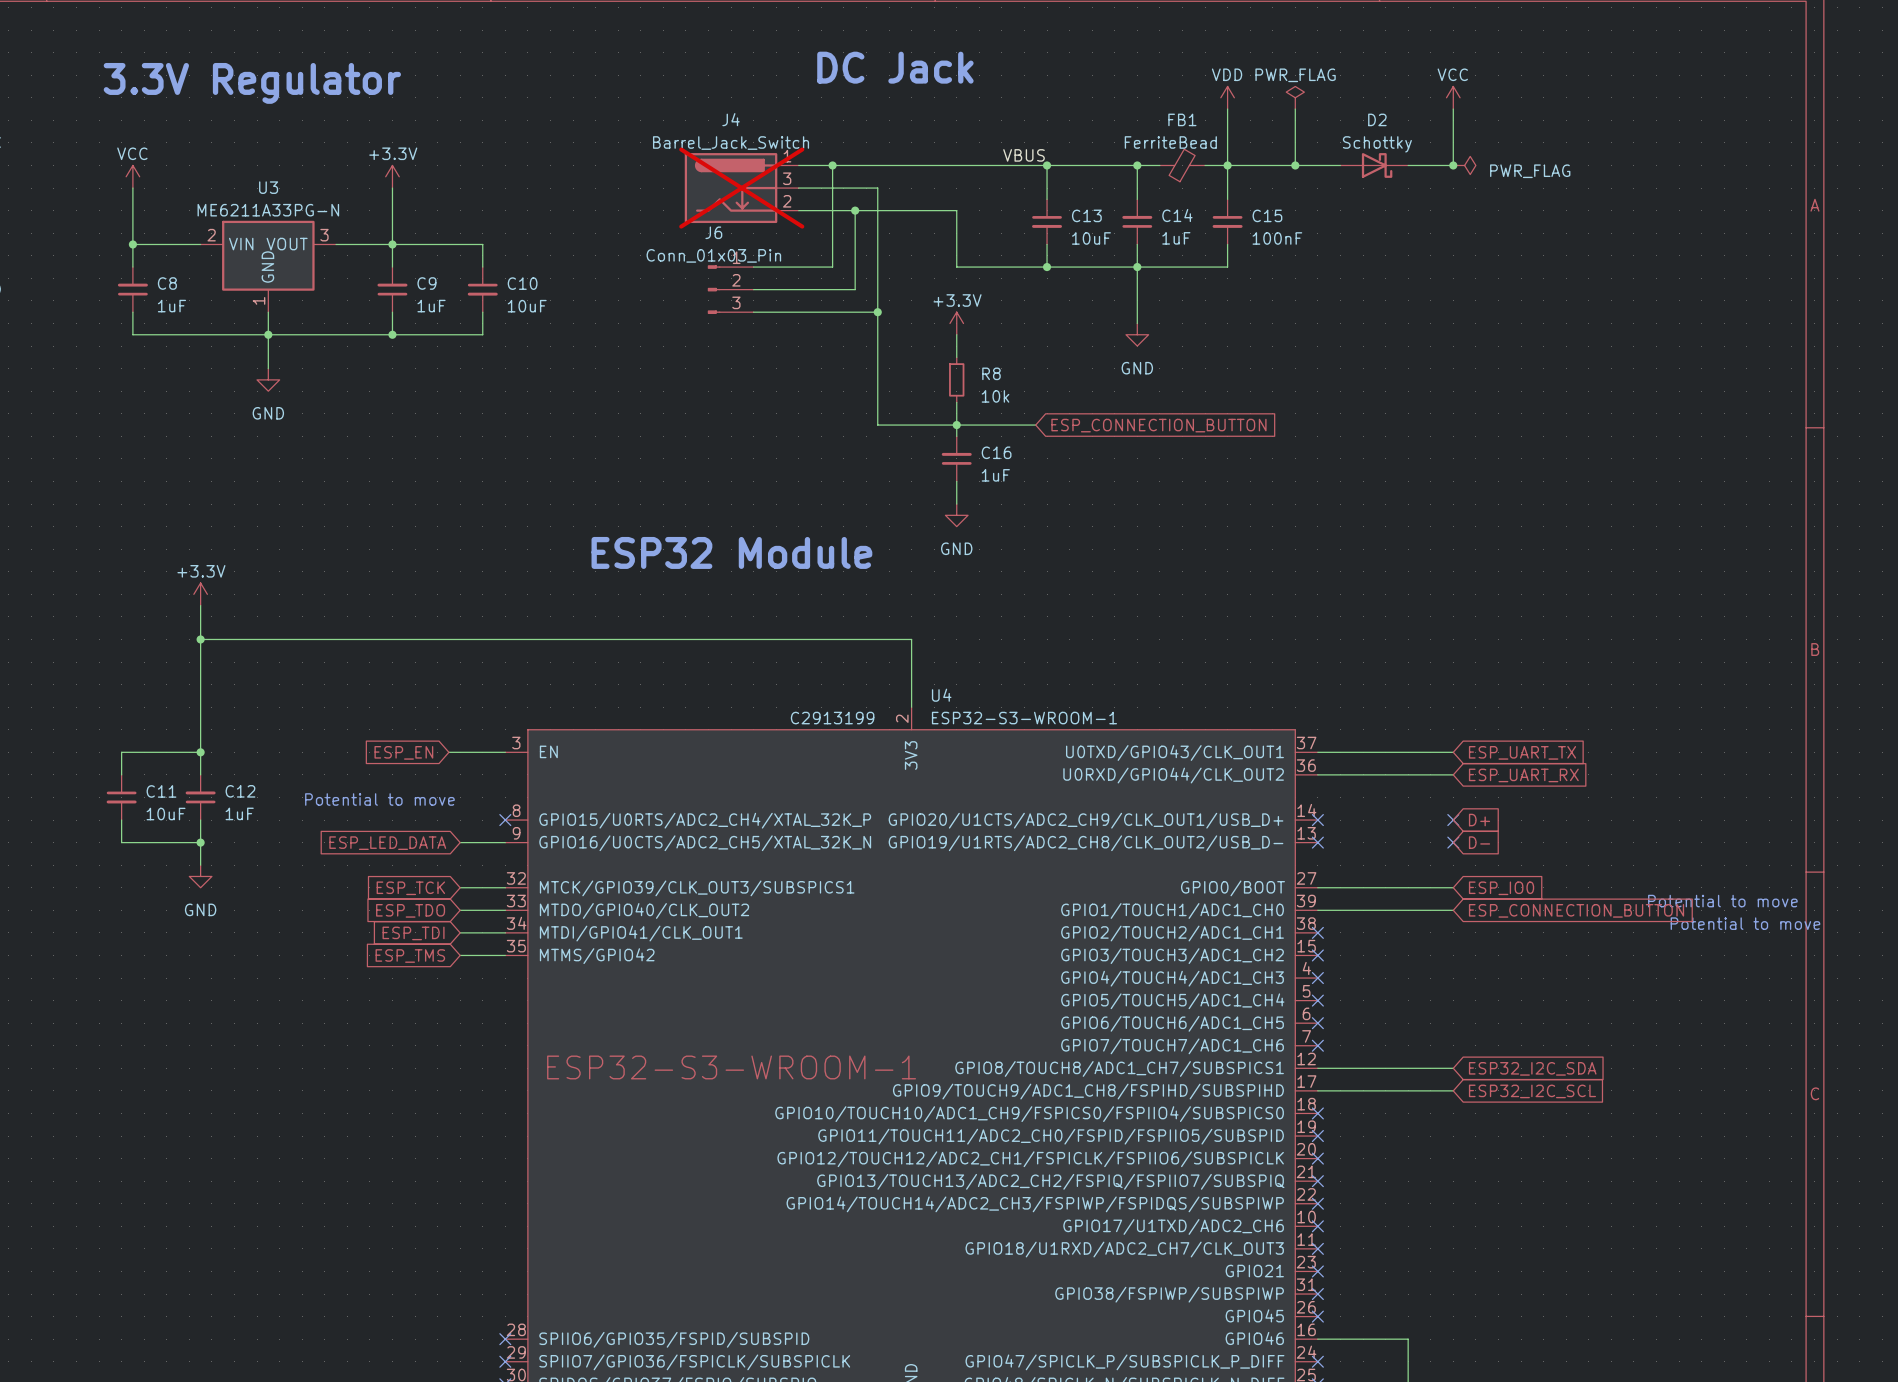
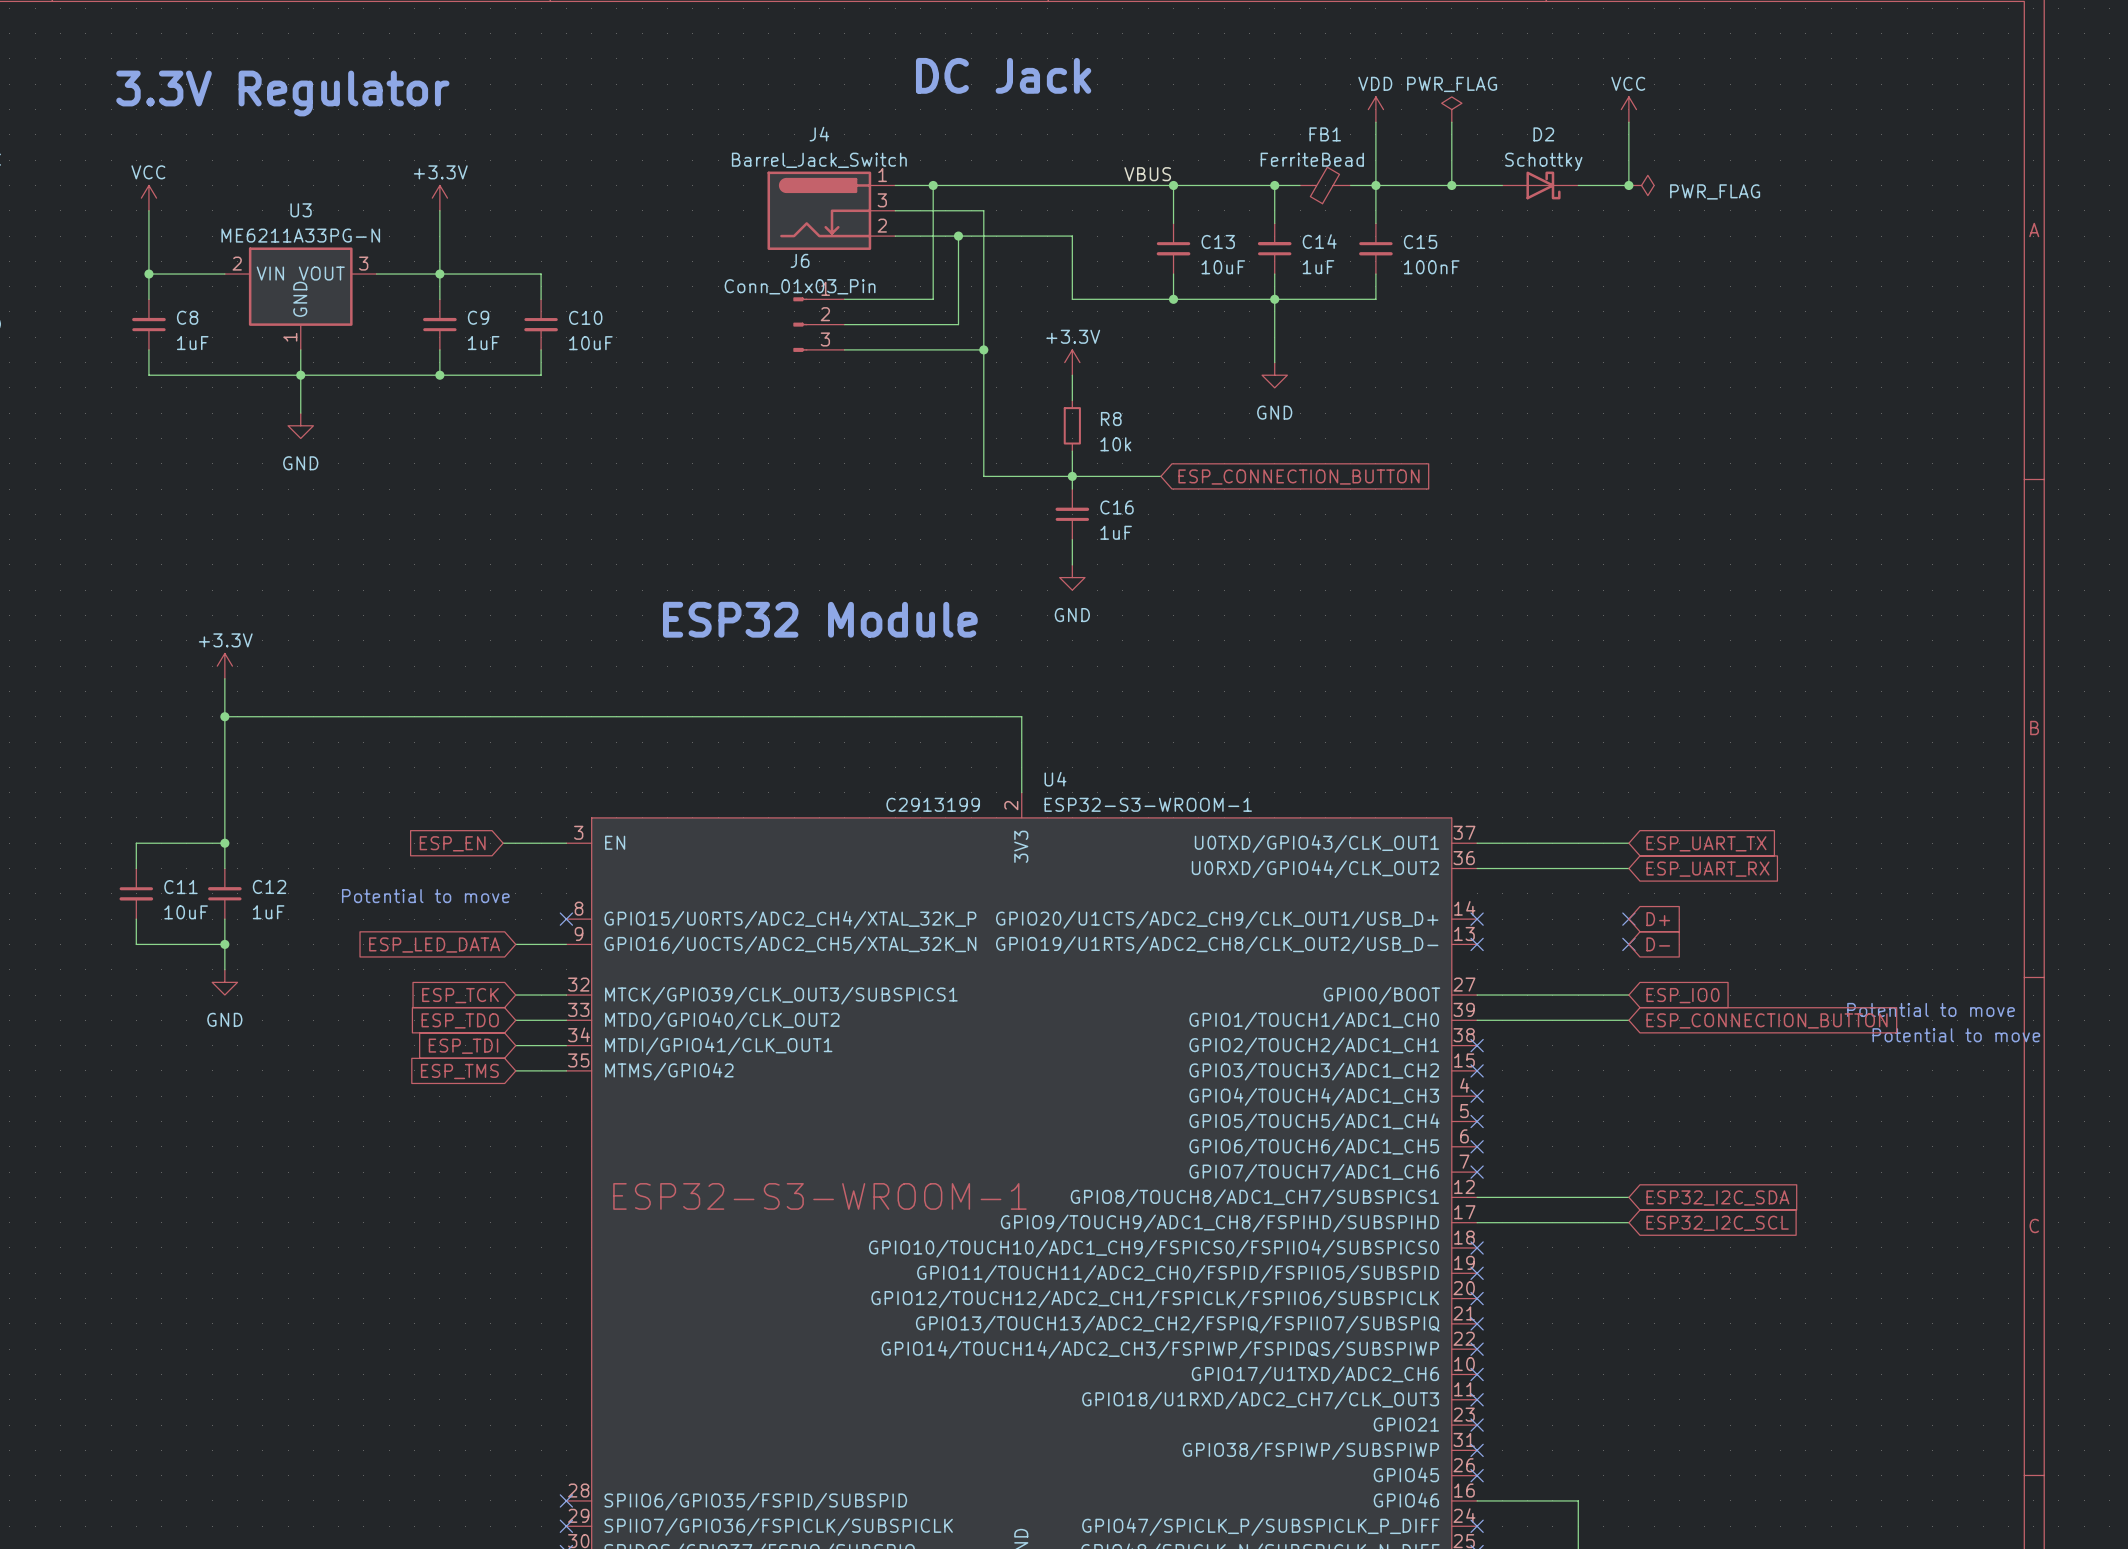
J4 do-not-place cross: (741, 188) -> none

